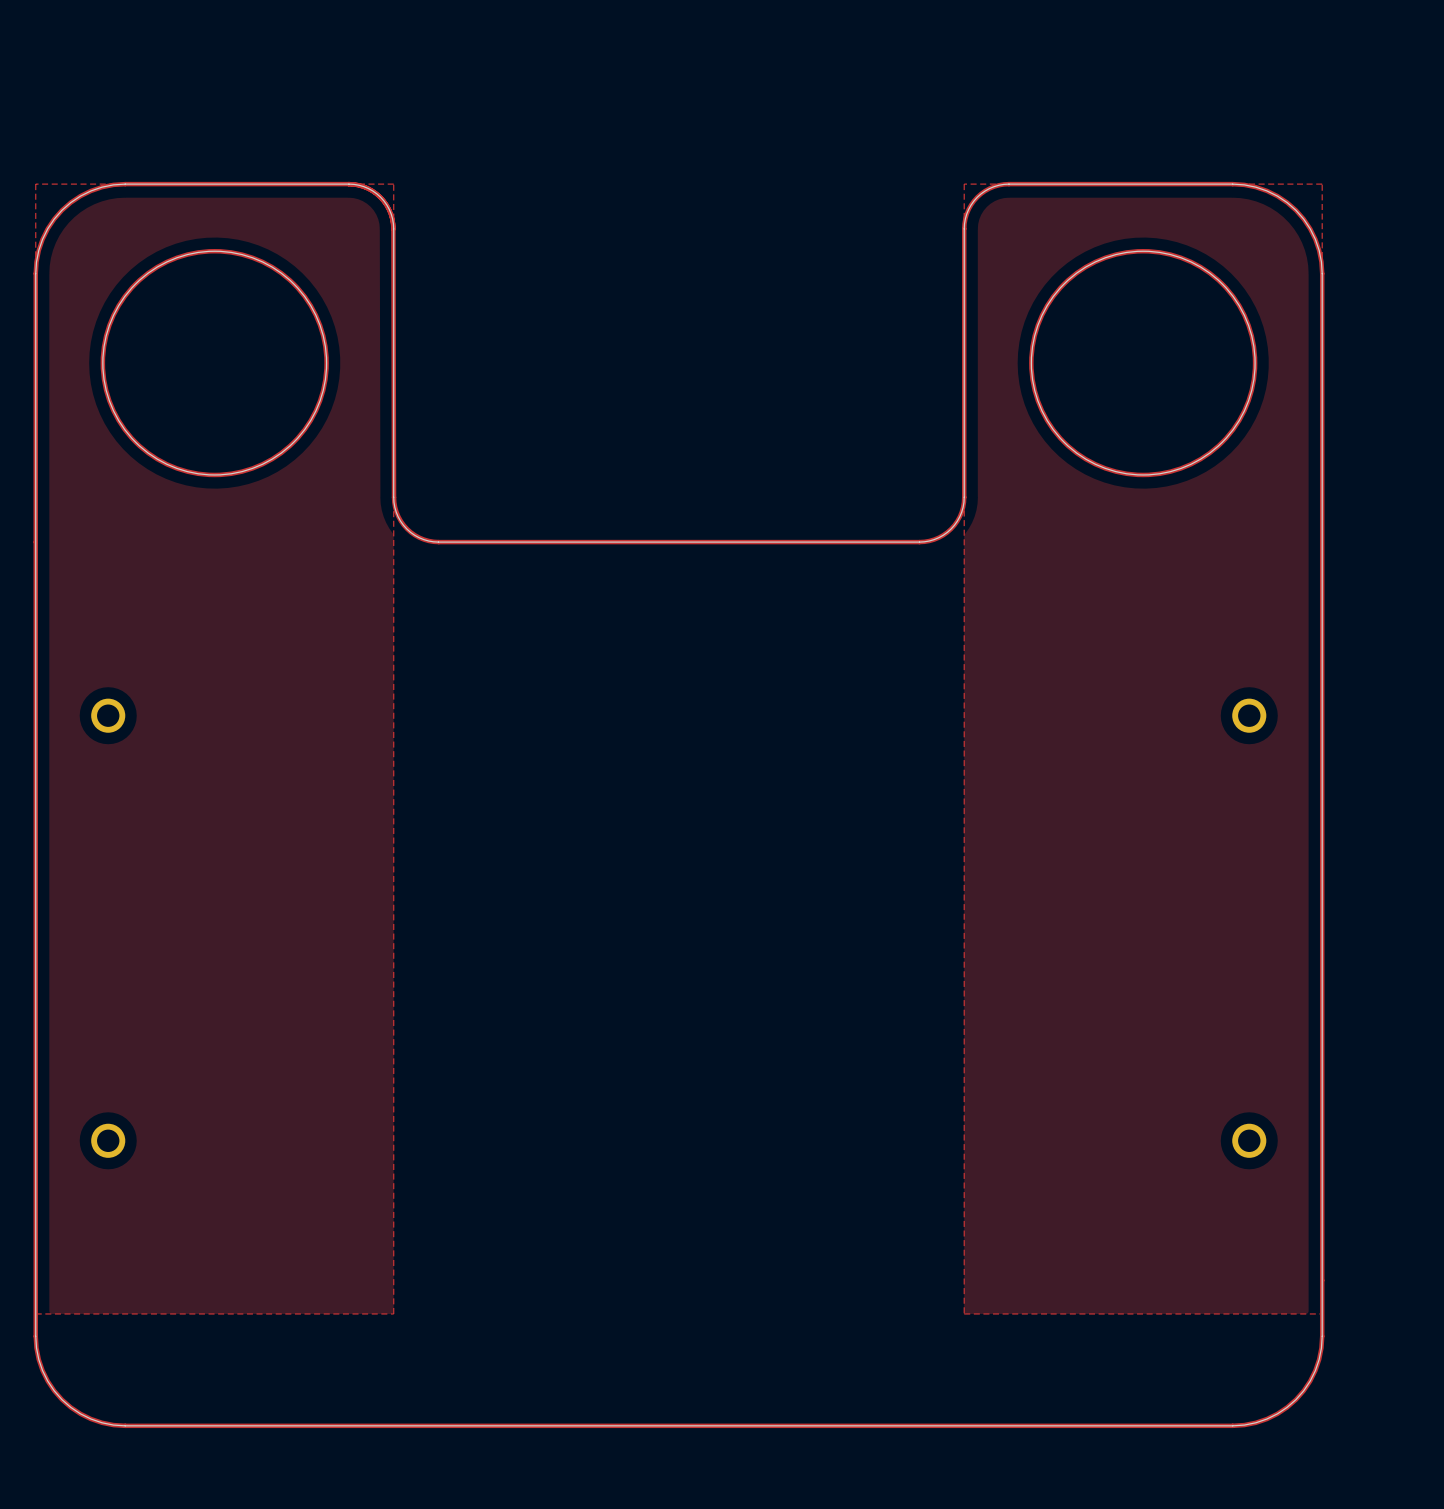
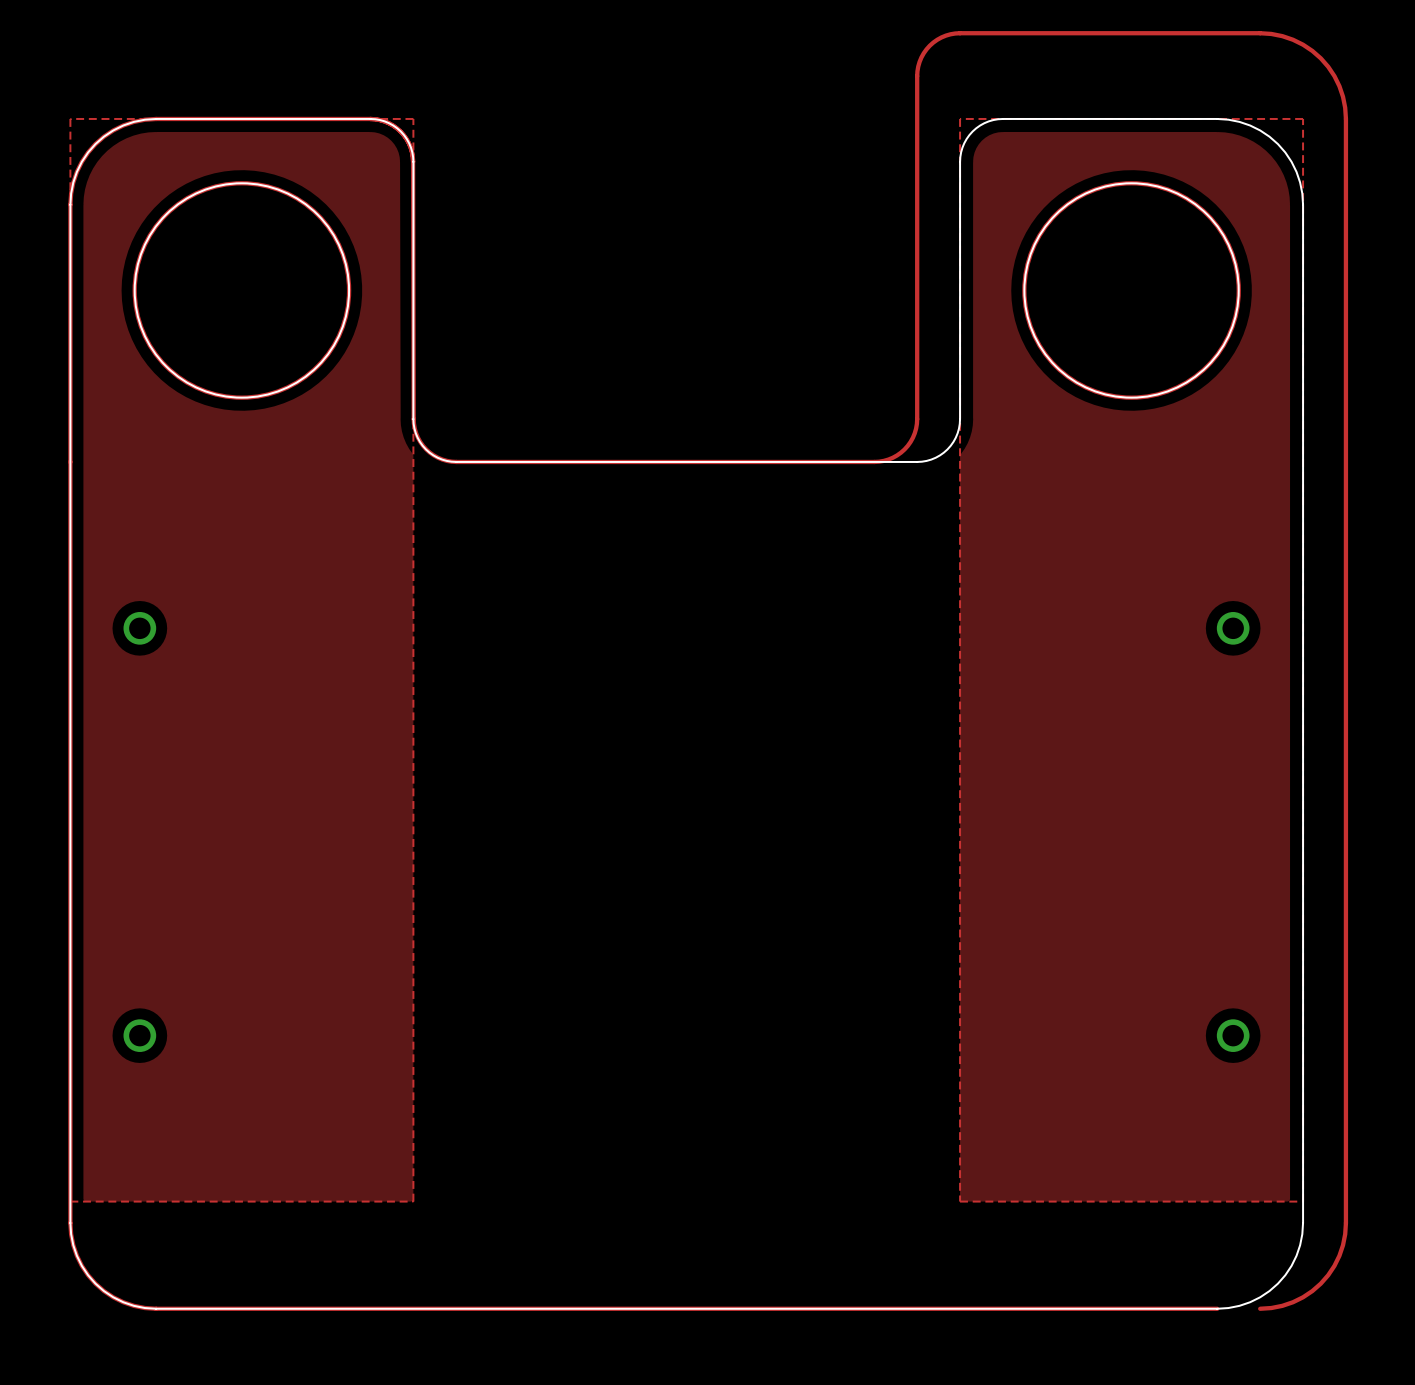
top track: (874, 542) (919, 542) (934, 539) (951, 528) (961, 512) (964, 497) (964, 223) (971, 205) (981, 193) (994, 186) (1008, 184) (1244, 184) (1266, 190) (1277, 196) (1287, 202) (1303, 219) (1315, 239) (1319, 250) (1322, 273) (1322, 1336) (1321, 1348) (1315, 1370) (1310, 1381) (1295, 1399) (1277, 1413) (1266, 1419) (1255, 1422) (1232, 1425) -> (874, 461) (888, 459) (901, 452) (912, 437) (916, 423) (917, 76) (921, 57) (929, 45) (945, 35) (960, 33) (1260, 33) (1293, 39) (1320, 58) (1339, 86) (1345, 118) (1345, 1223) (1339, 1255) (1320, 1283) (1293, 1302) (1260, 1308)

